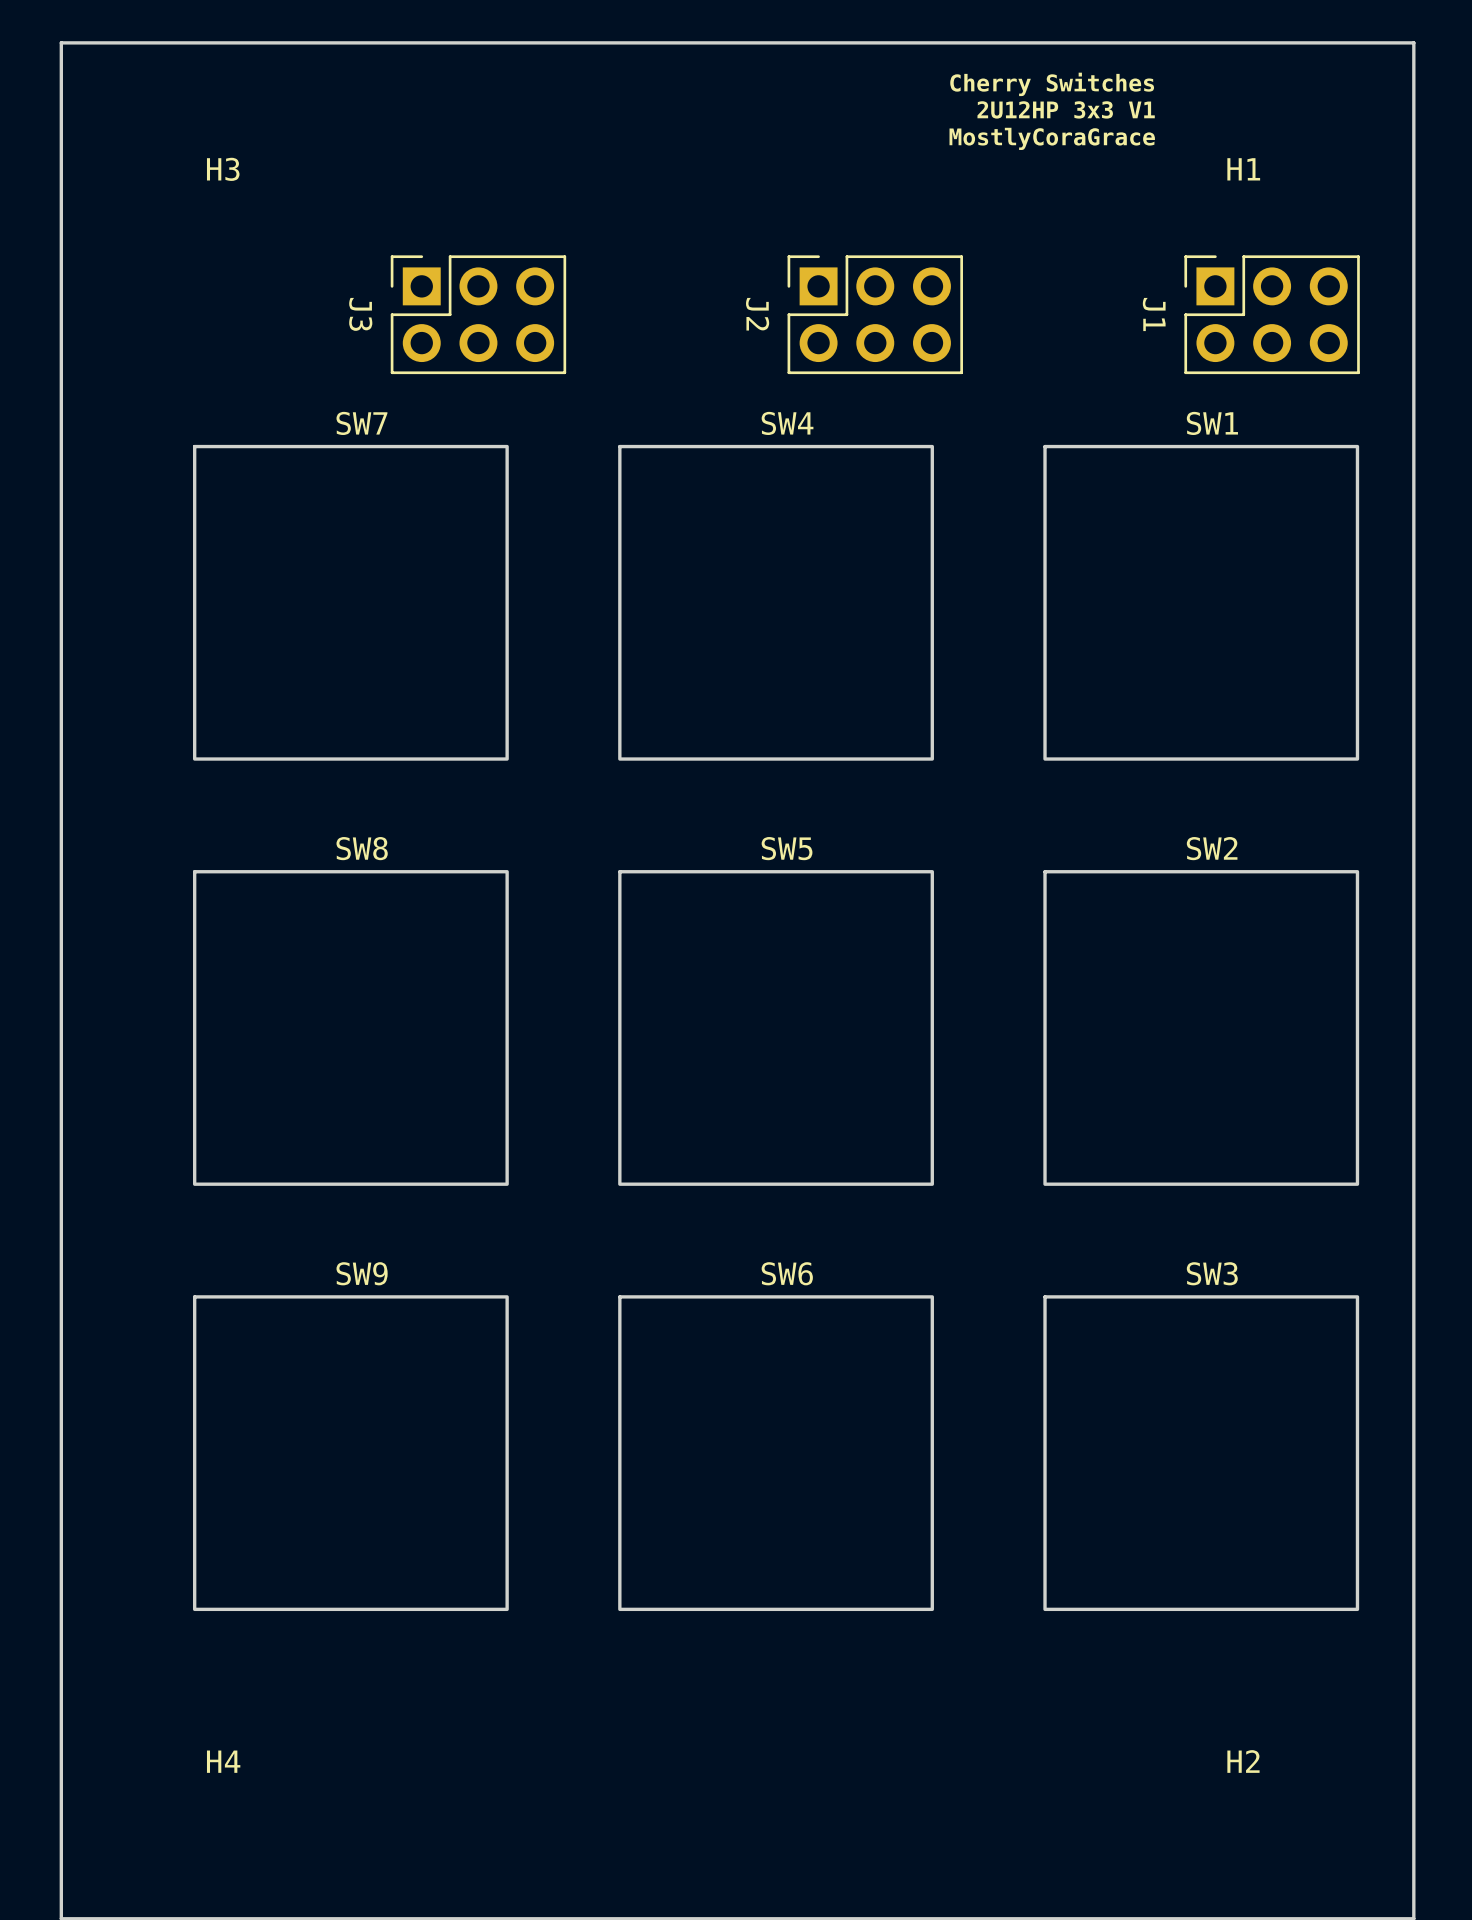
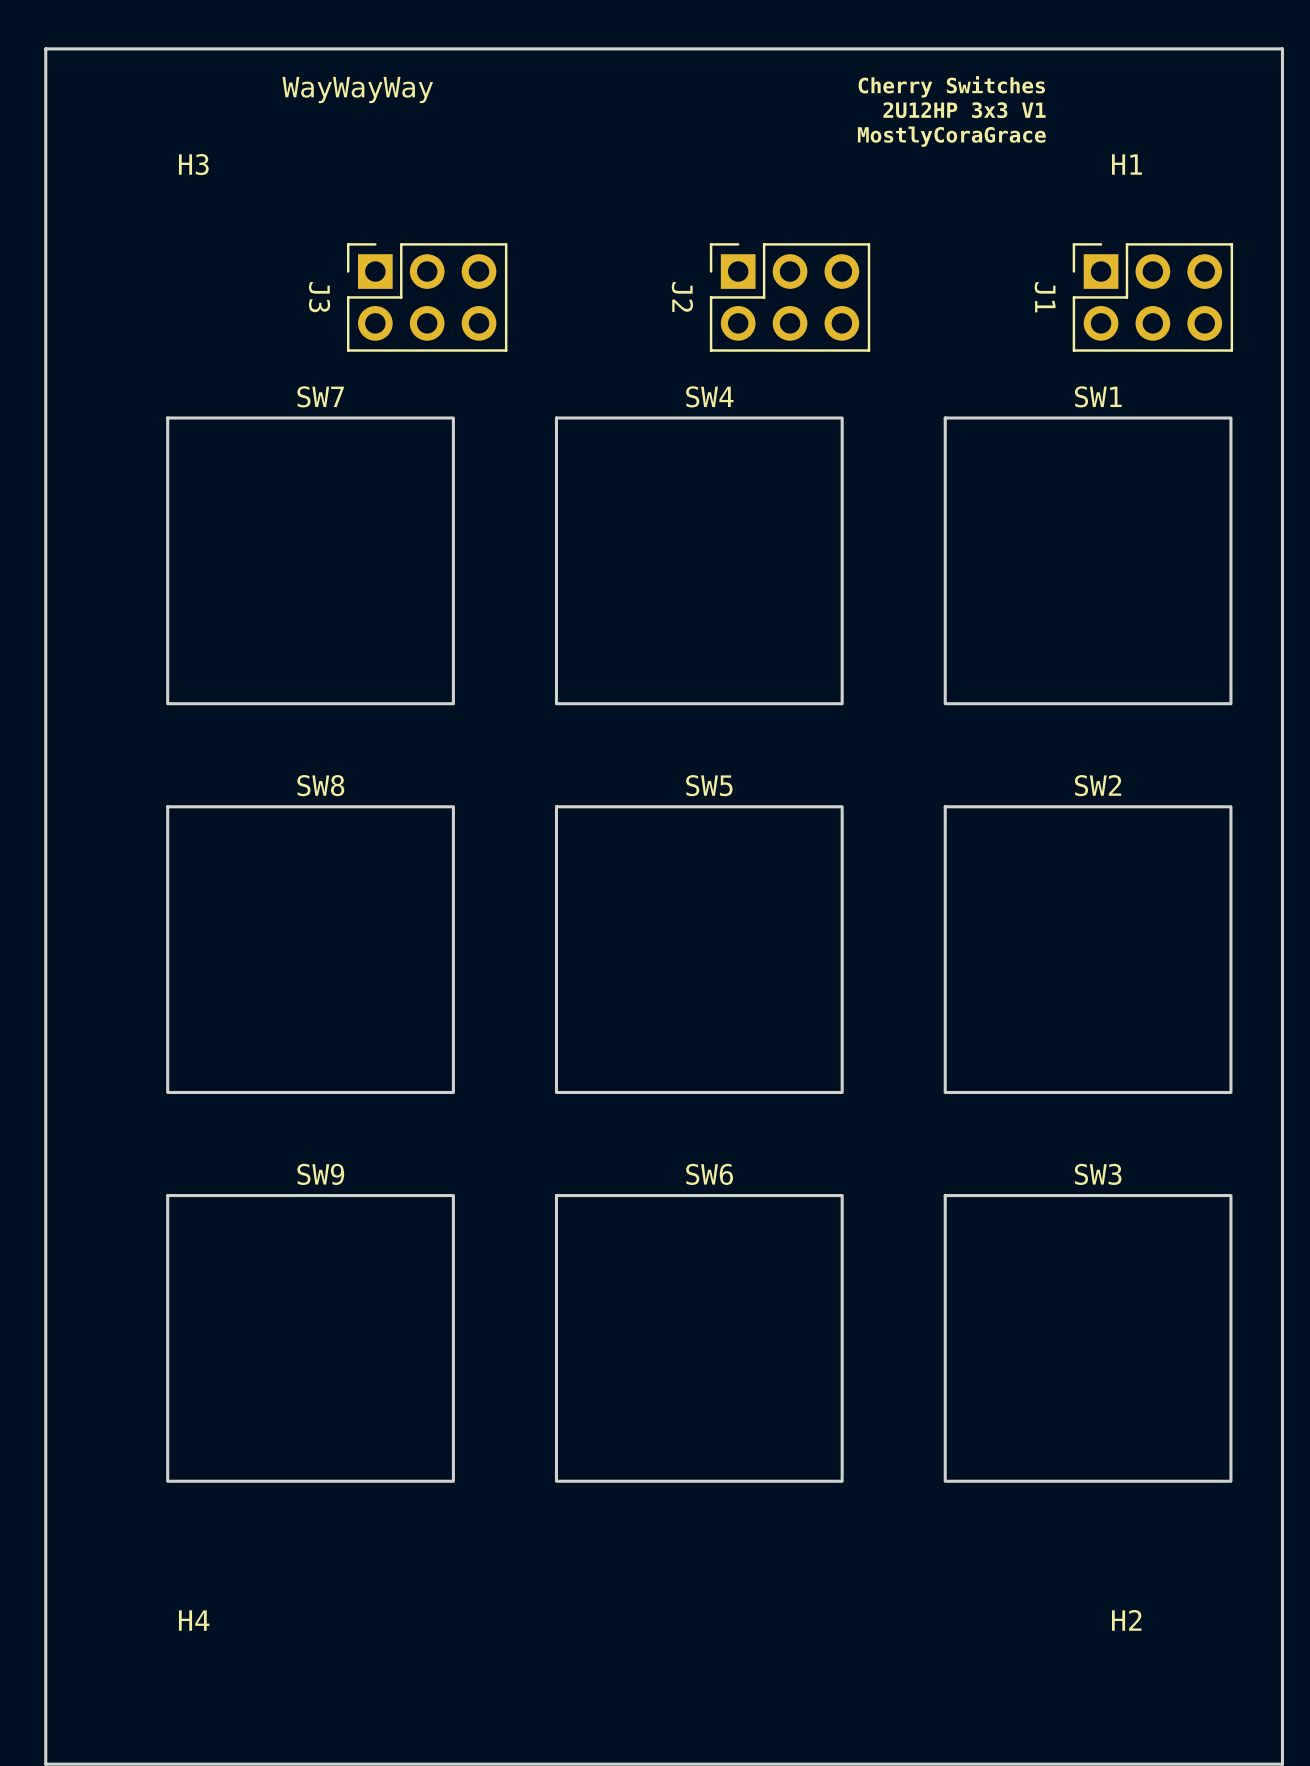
text: none -> WayWayWay (357, 90)

